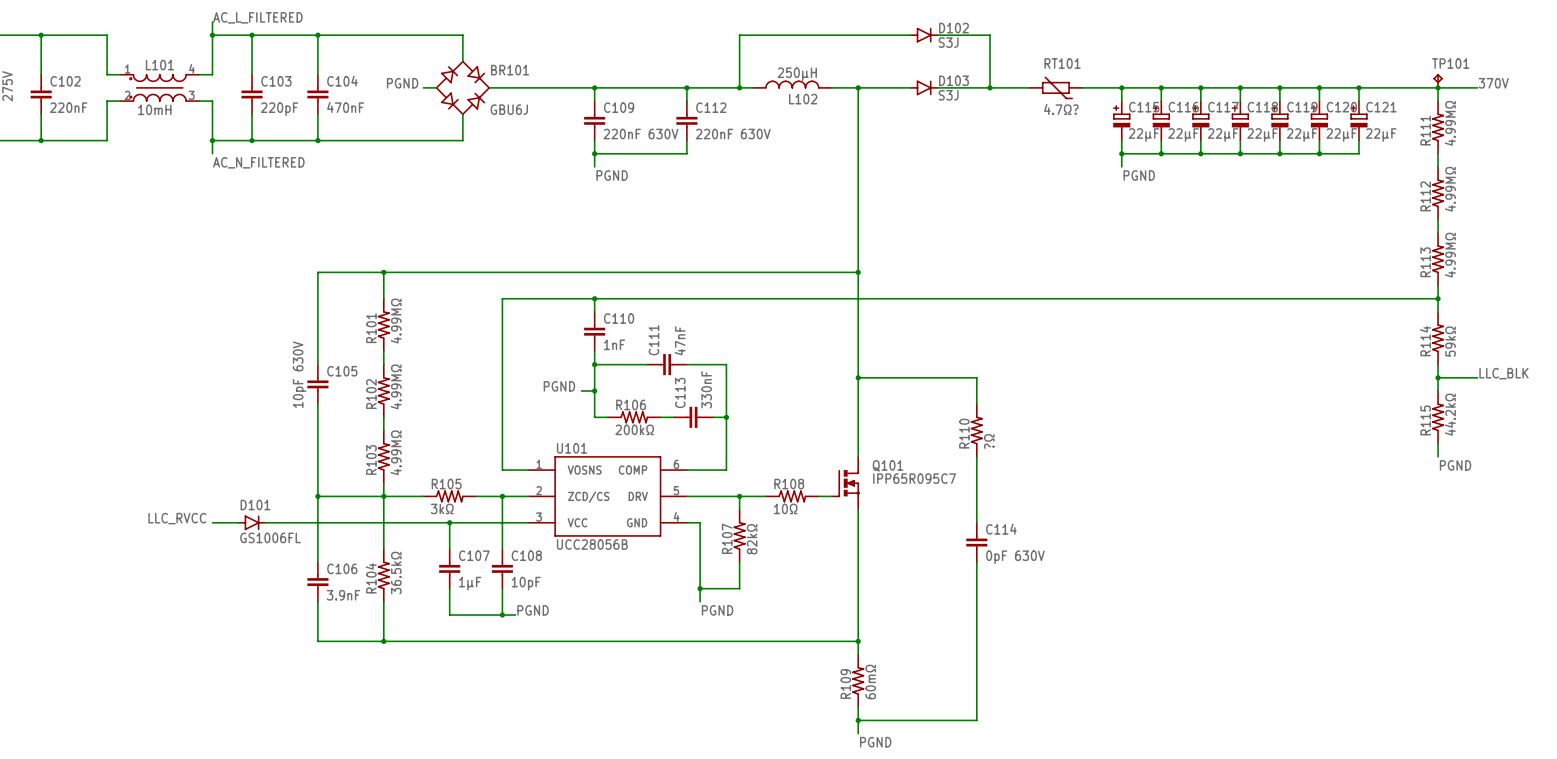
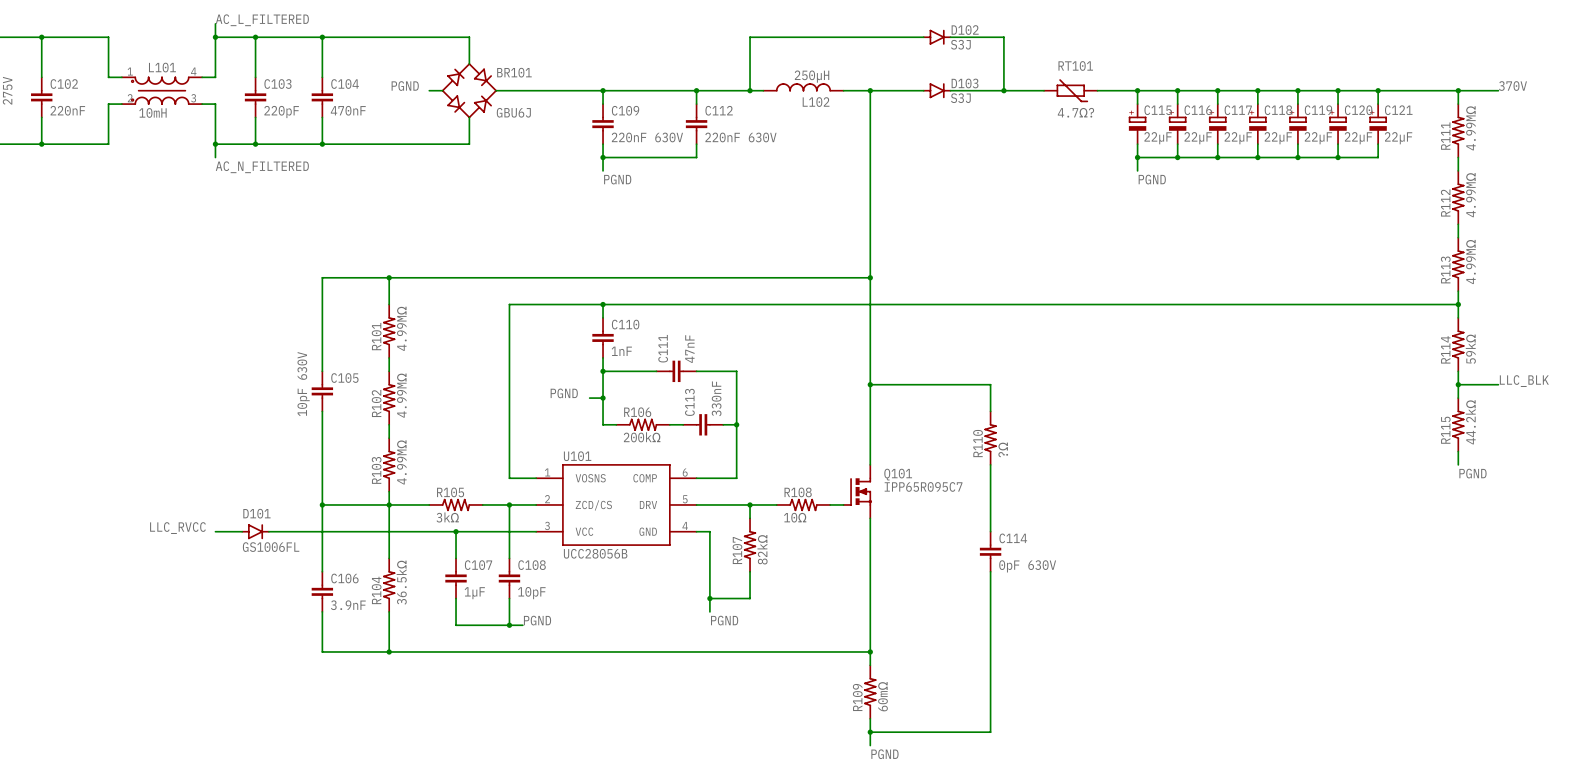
TP101: (1438, 80) -> none

